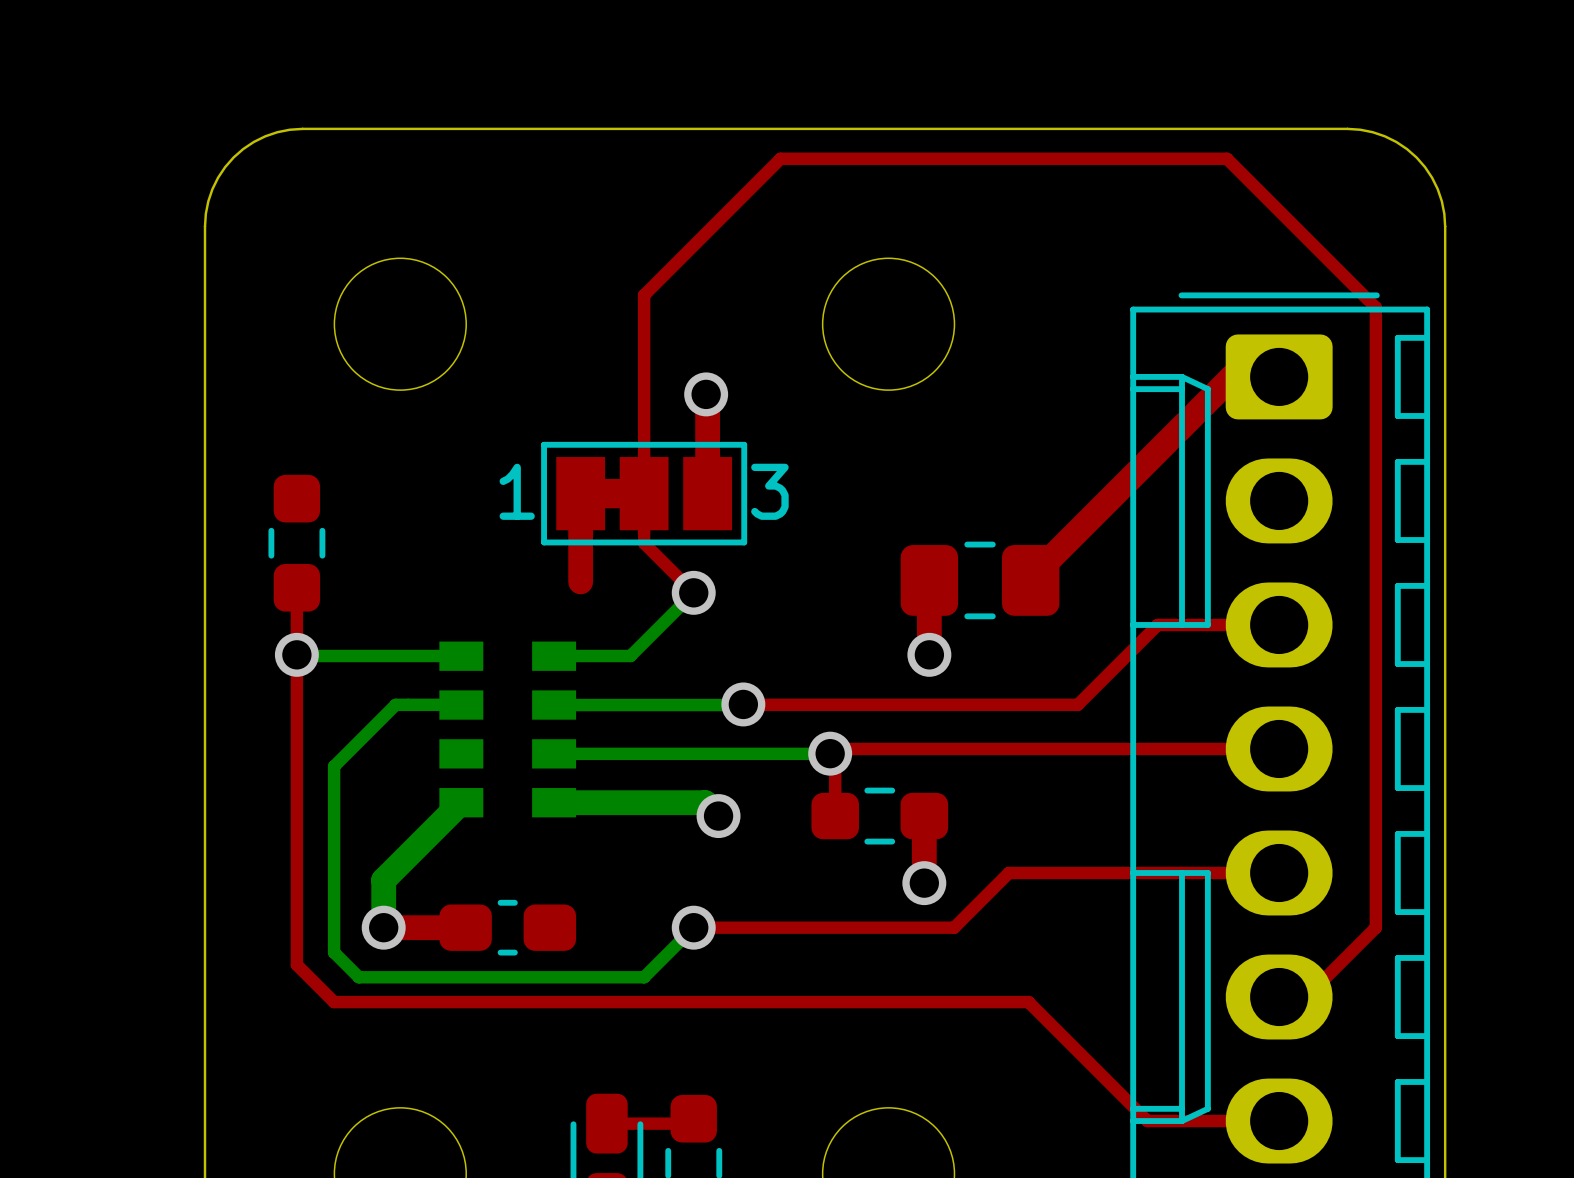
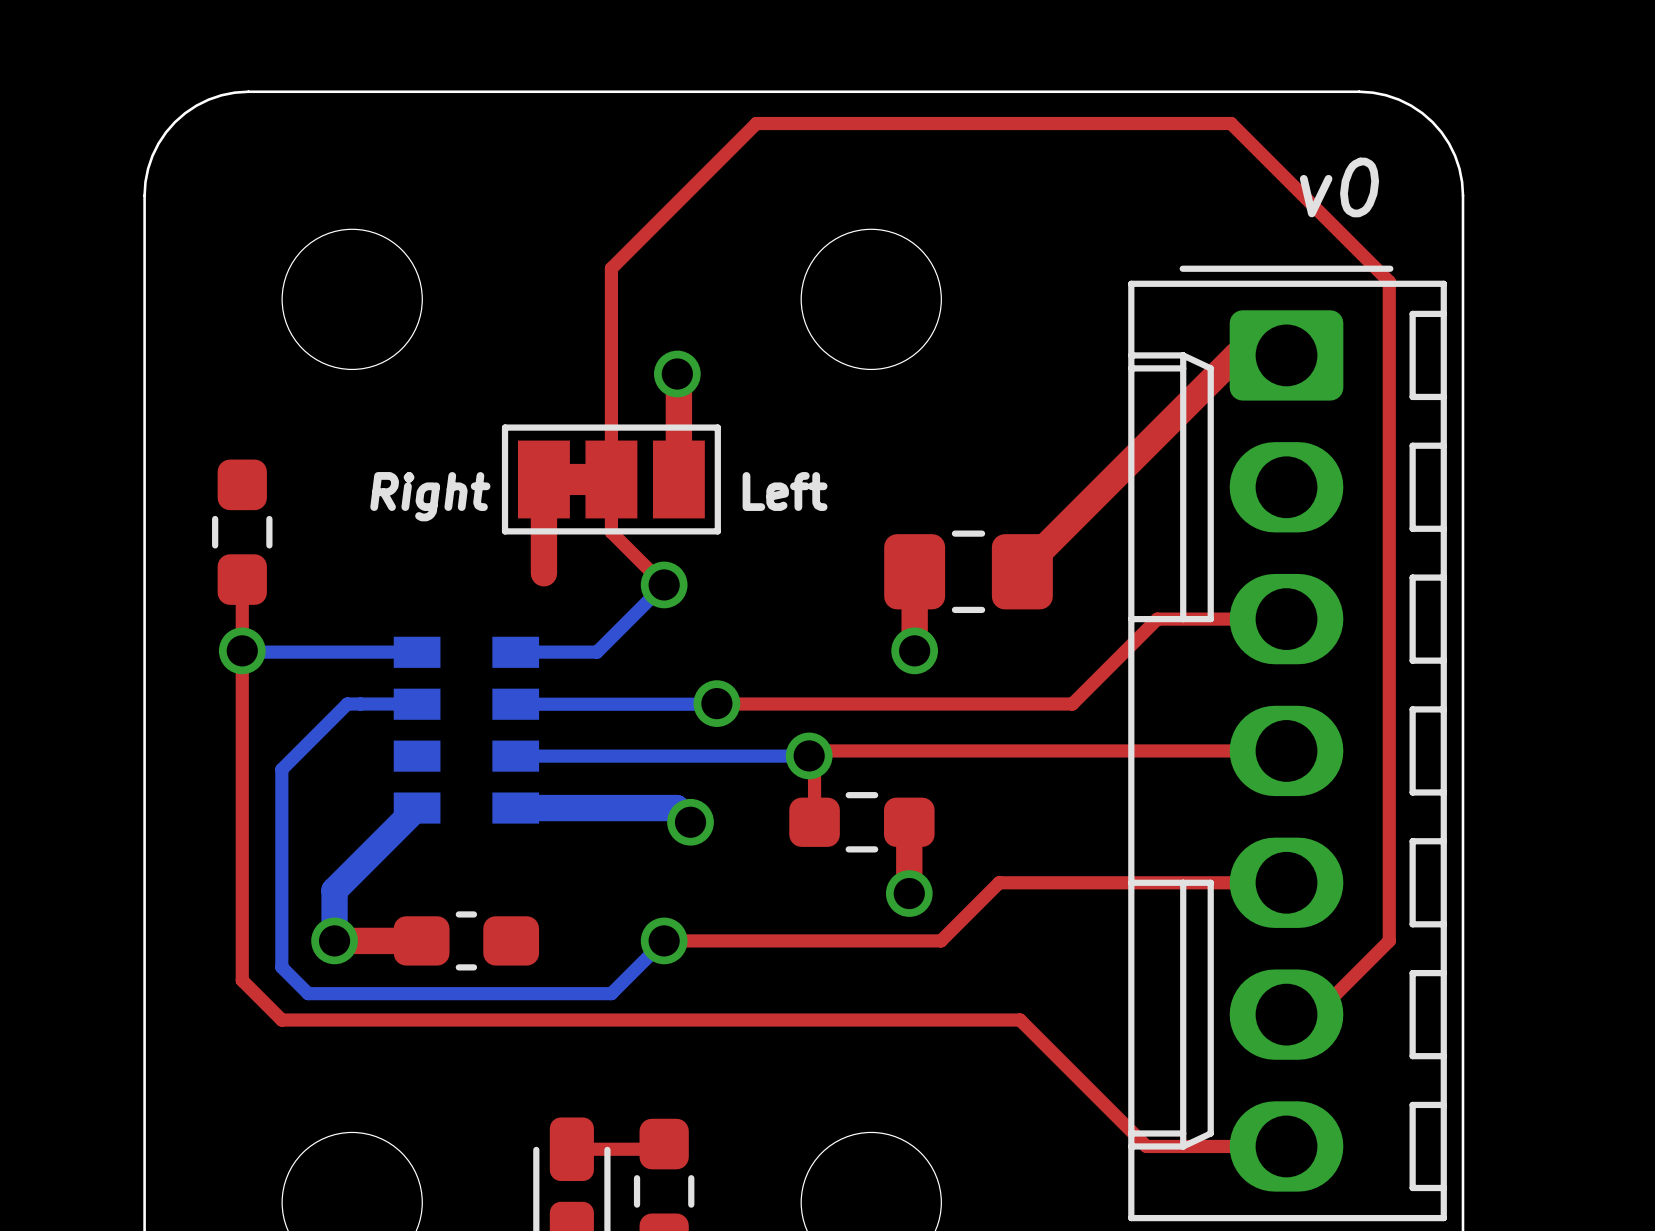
text: none -> v0 (1339, 187)
part text: 1 (517, 491) -> none
part text: 3 (769, 491) -> none
text: none -> Left (785, 491)
text: none -> Right (430, 496)

